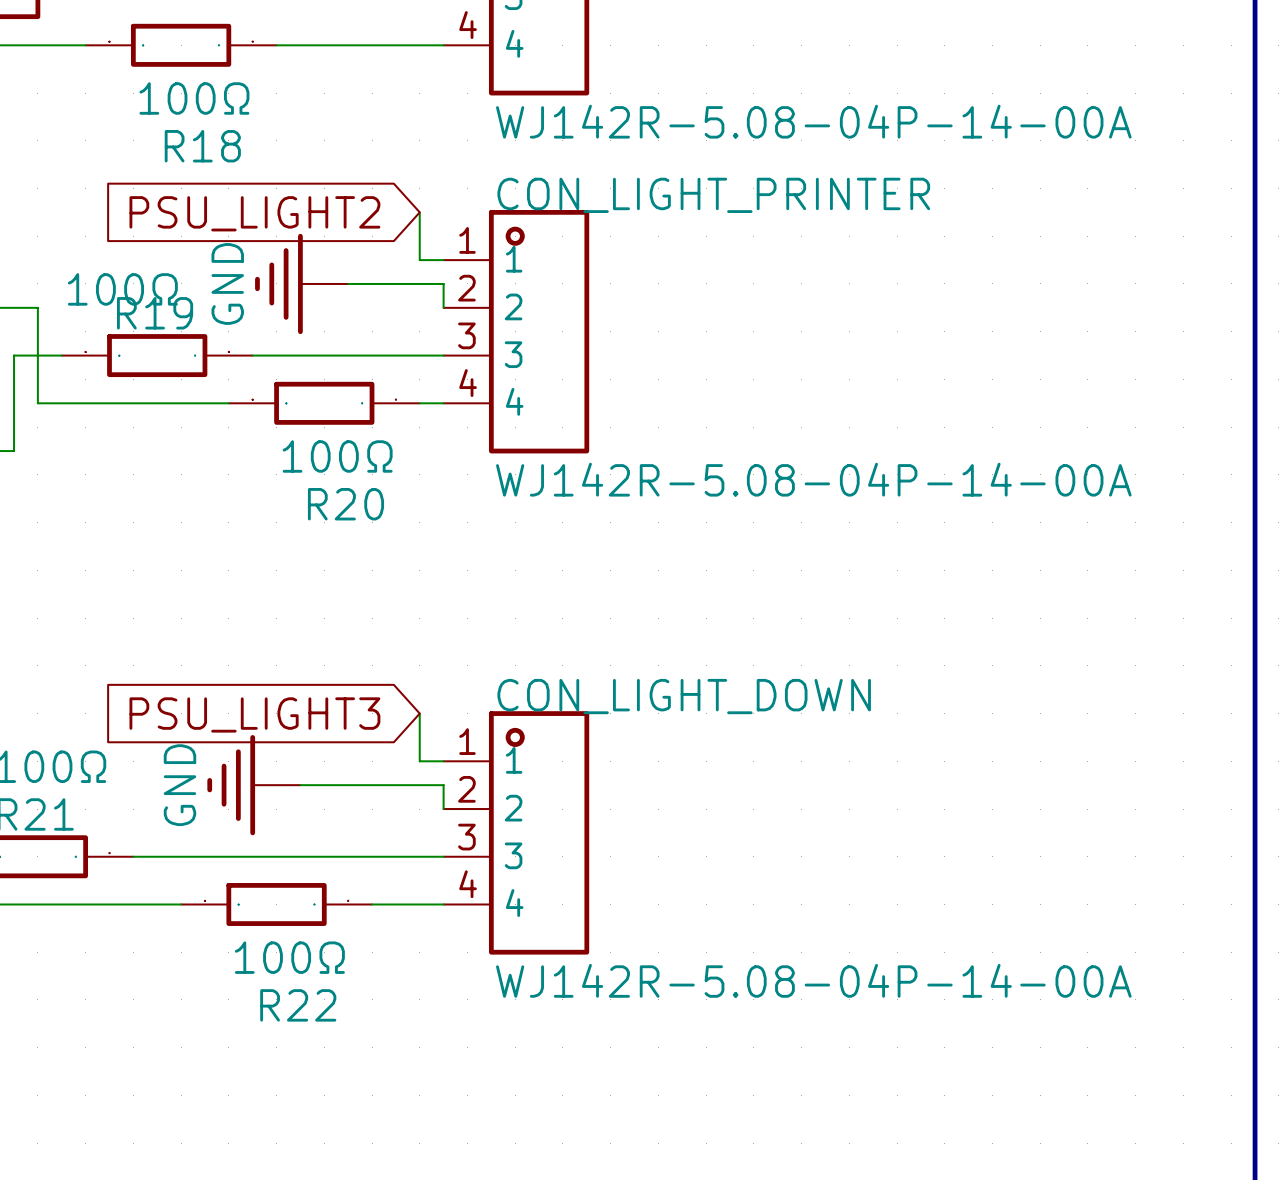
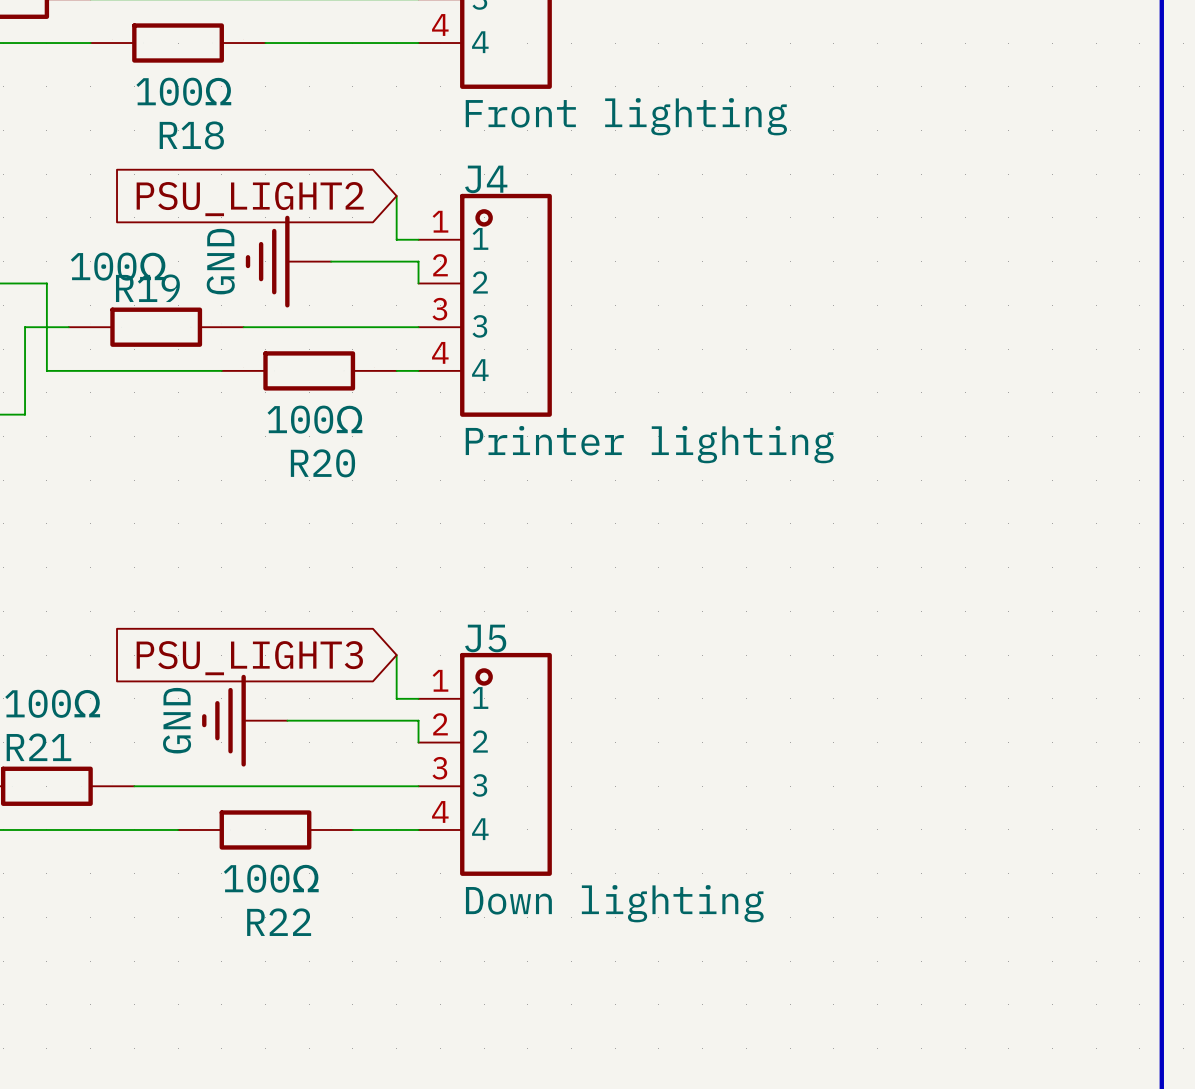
part value: WJ142R-5.08-04P-14-00A (813, 121) -> Front lighting (626, 116)
CON_LIGHT_PRINTER name: CON_LIGHT_PRINTER (713, 195) -> J4 (486, 179)
CON_LIGHT_PRINTER value: WJ142R-5.08-04P-14-00A (813, 479) -> Printer lighting (649, 444)
CON_LIGHT_DOWN name: CON_LIGHT_DOWN (684, 696) -> J5 (485, 638)
CON_LIGHT_DOWN value: WJ142R-5.08-04P-14-00A (813, 980) -> Down lighting (614, 903)

